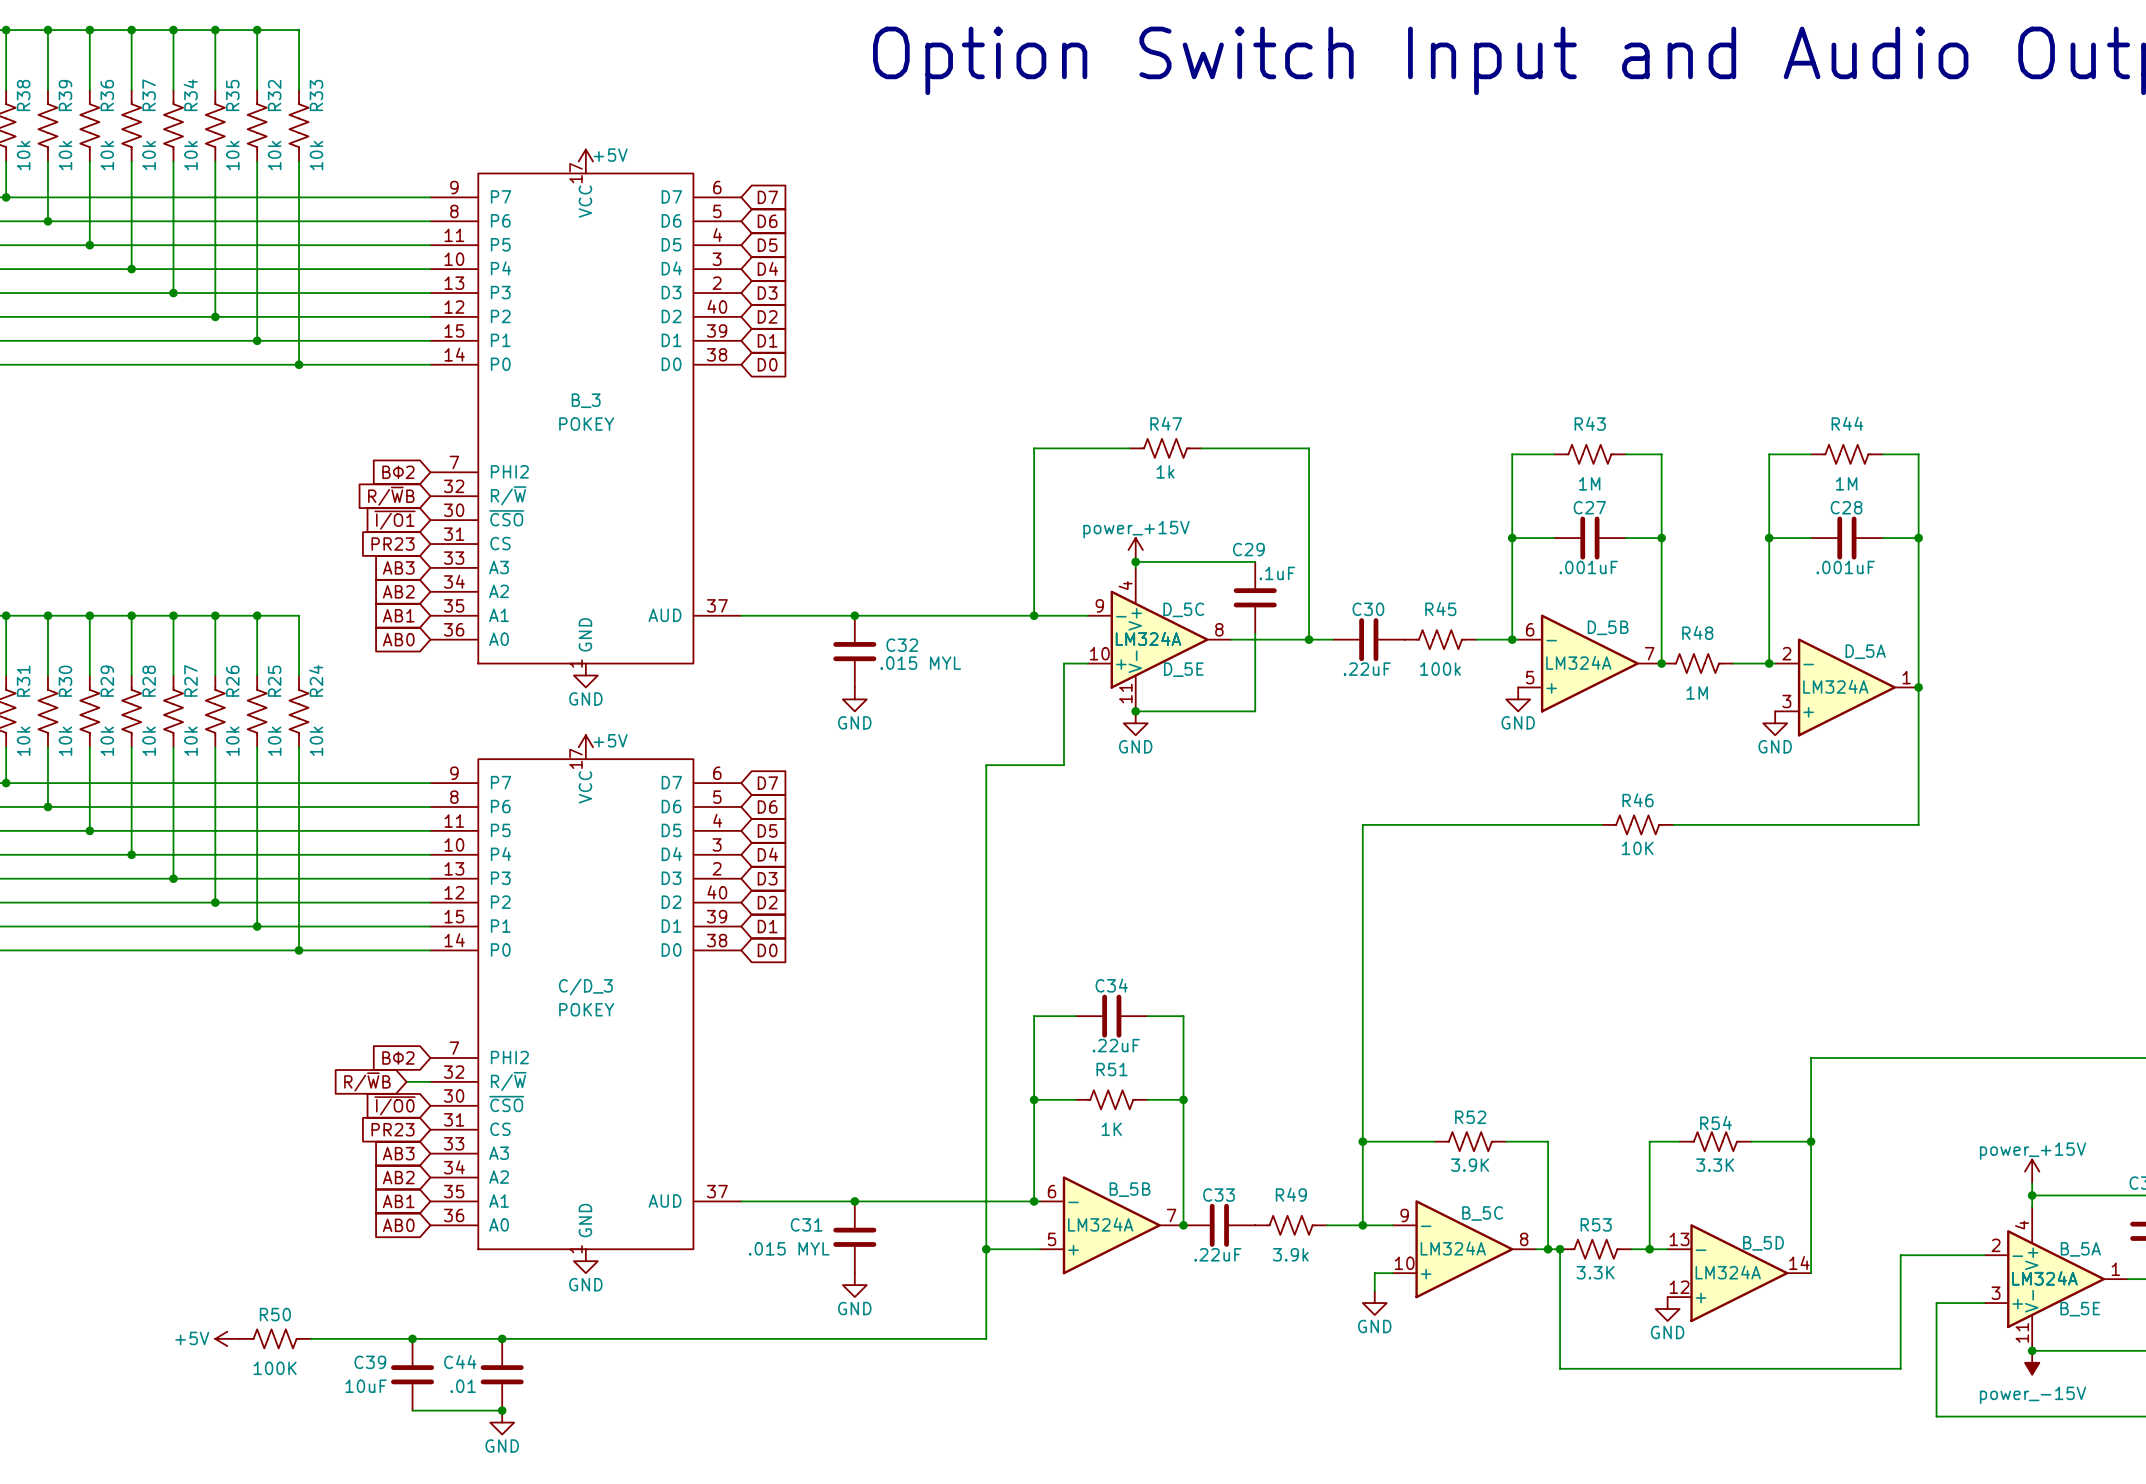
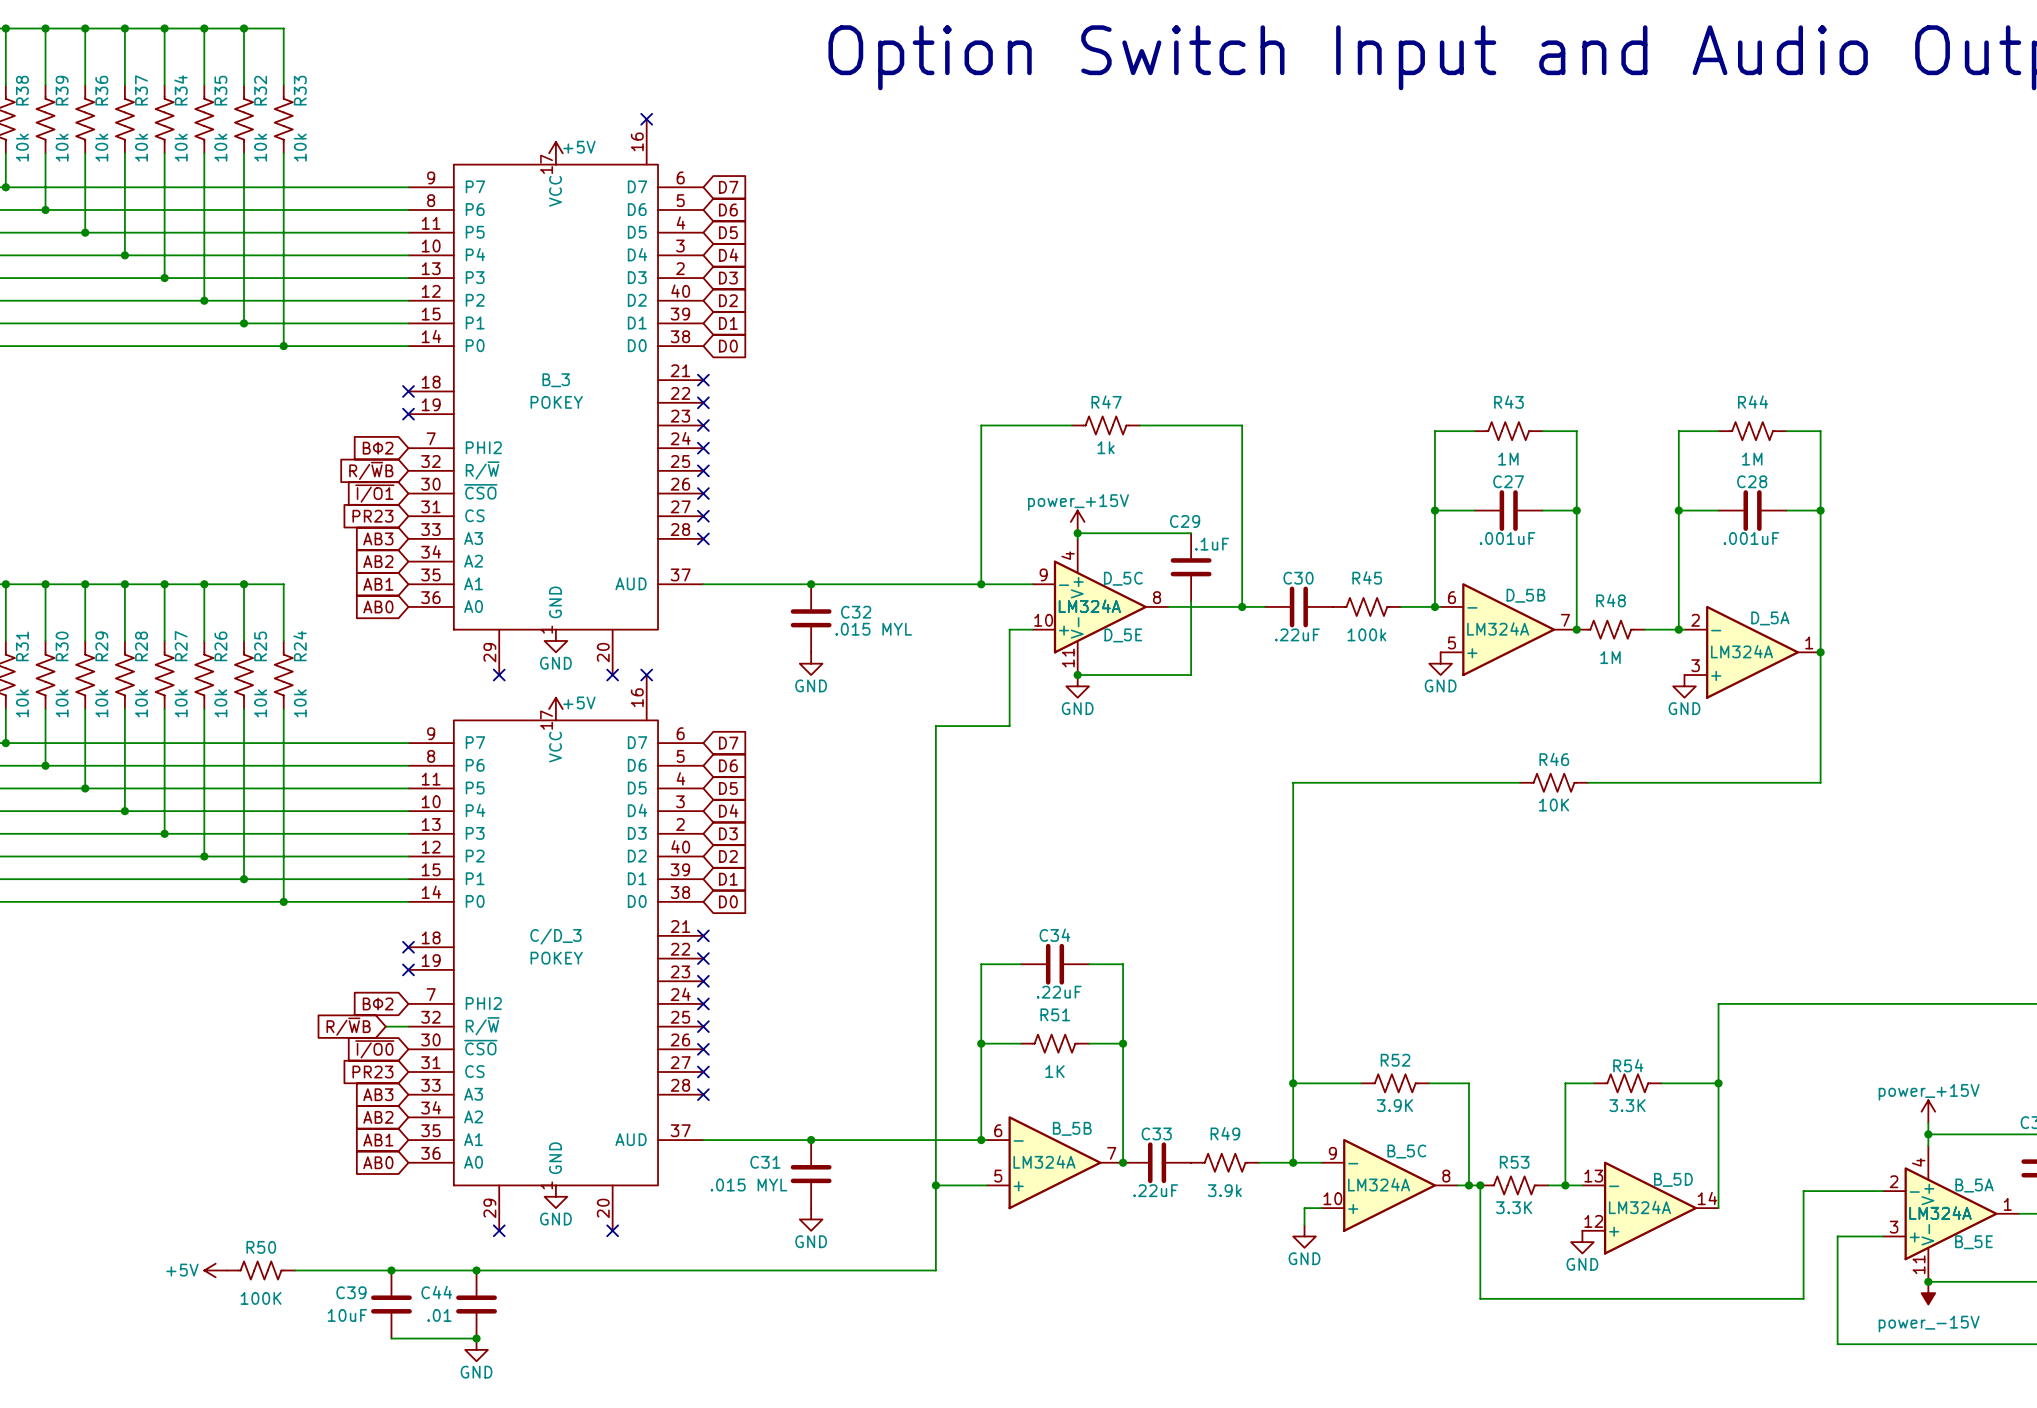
no-connect mark: none -> (646, 119)
B_3 symbol: [430, 173, 742, 664] -> [408, 119, 704, 676]
no-connect mark: none -> (703, 380)
no-connect mark: none -> (408, 391)
no-connect mark: none -> (703, 402)
no-connect mark: none -> (408, 414)
no-connect mark: none -> (703, 425)
no-connect mark: none -> (703, 448)
no-connect mark: none -> (703, 470)
no-connect mark: none -> (703, 493)
no-connect mark: none -> (703, 516)
no-connect mark: none -> (703, 538)
no-connect mark: none -> (499, 675)
no-connect mark: none -> (612, 675)
no-connect mark: none -> (646, 675)
C/D_3 symbol: [430, 759, 742, 1250] -> [408, 675, 704, 1231]
no-connect mark: none -> (703, 935)
no-connect mark: none -> (408, 947)
no-connect mark: none -> (703, 958)
no-connect mark: none -> (408, 969)
no-connect mark: none -> (703, 981)
no-connect mark: none -> (703, 1003)
no-connect mark: none -> (703, 1026)
no-connect mark: none -> (703, 1049)
no-connect mark: none -> (703, 1072)
no-connect mark: none -> (703, 1094)
no-connect mark: none -> (499, 1230)
no-connect mark: none -> (612, 1230)

